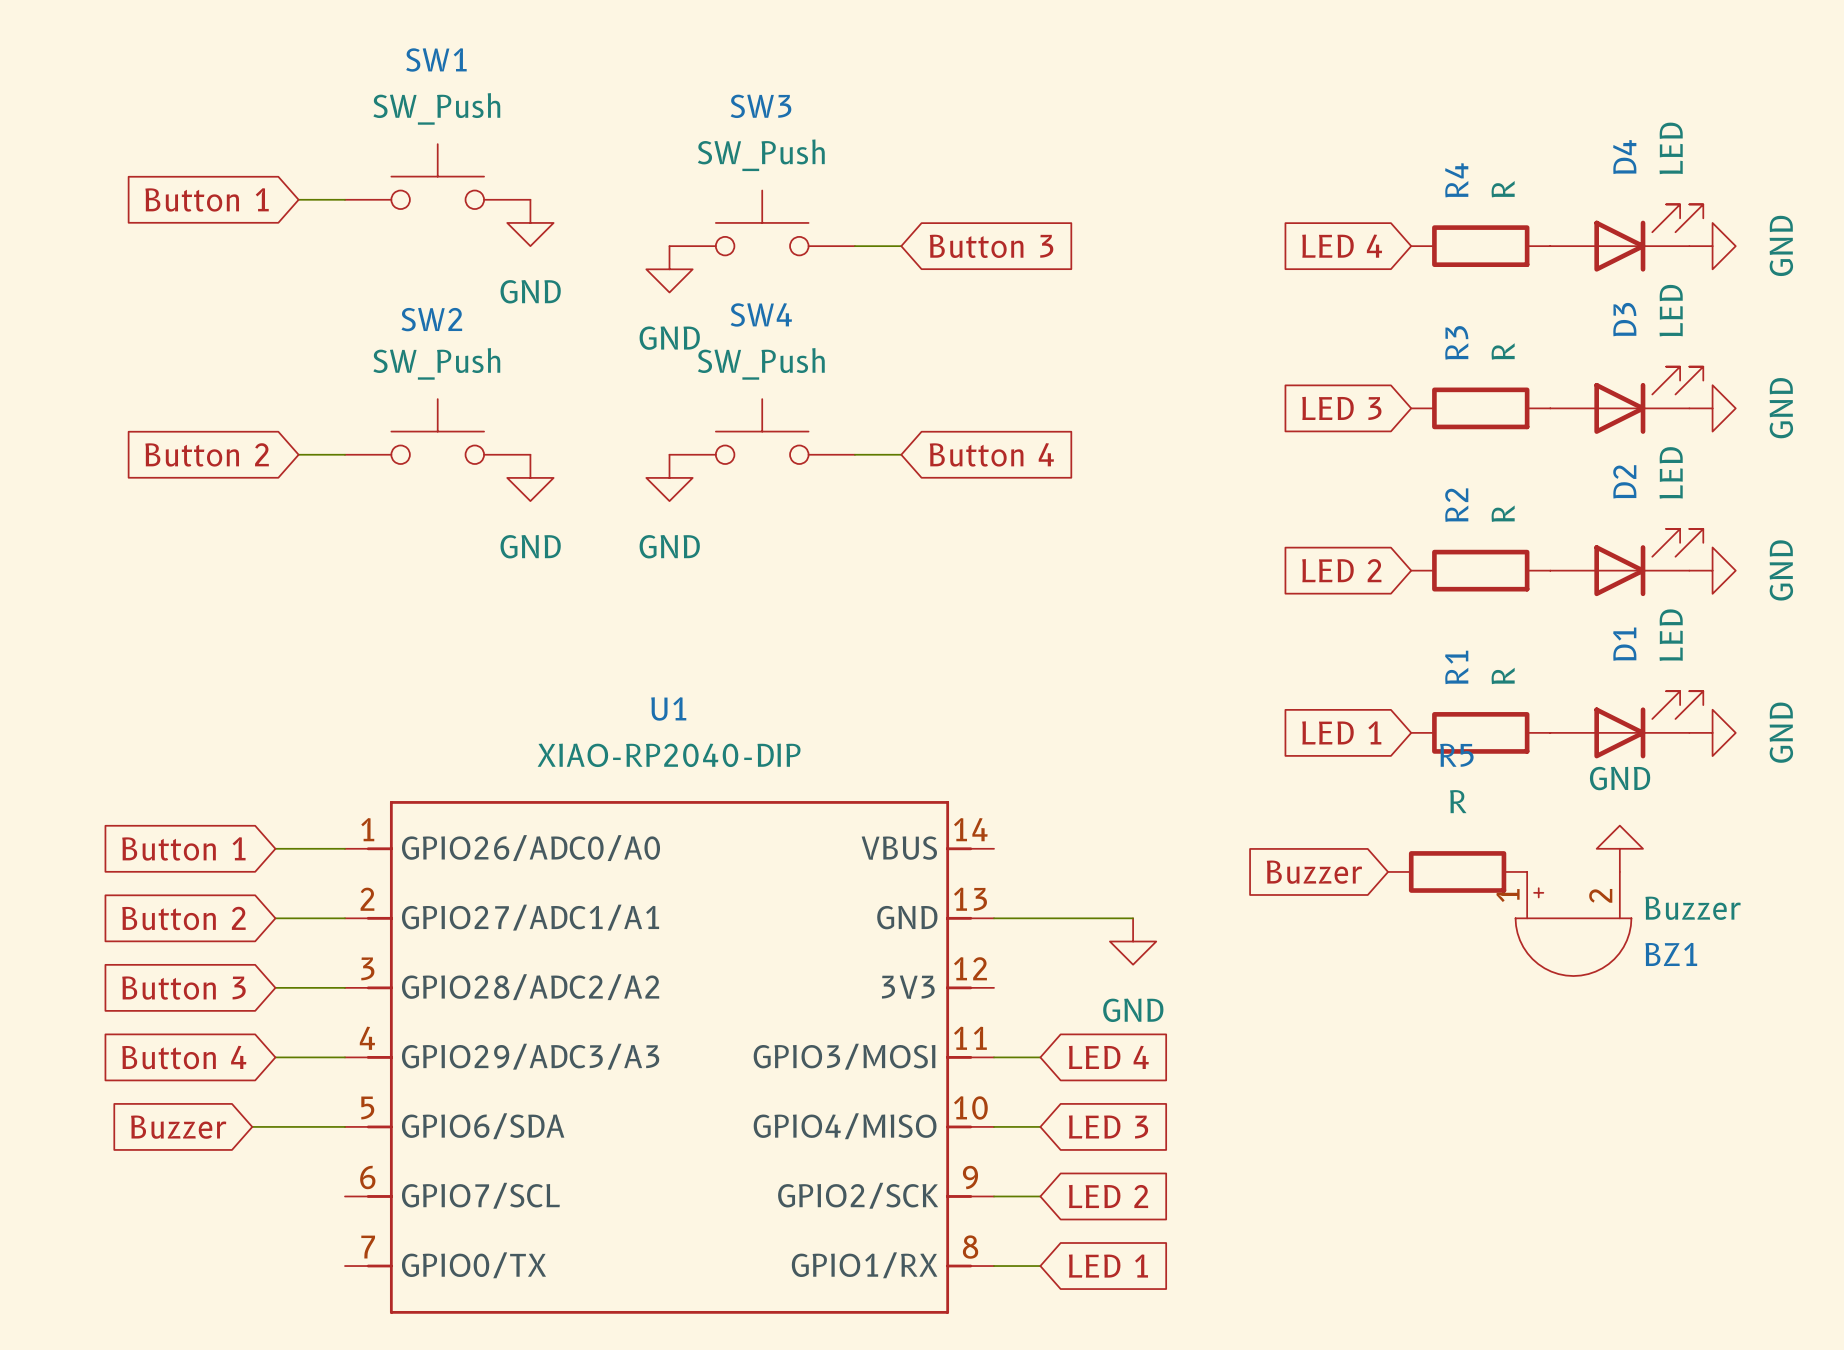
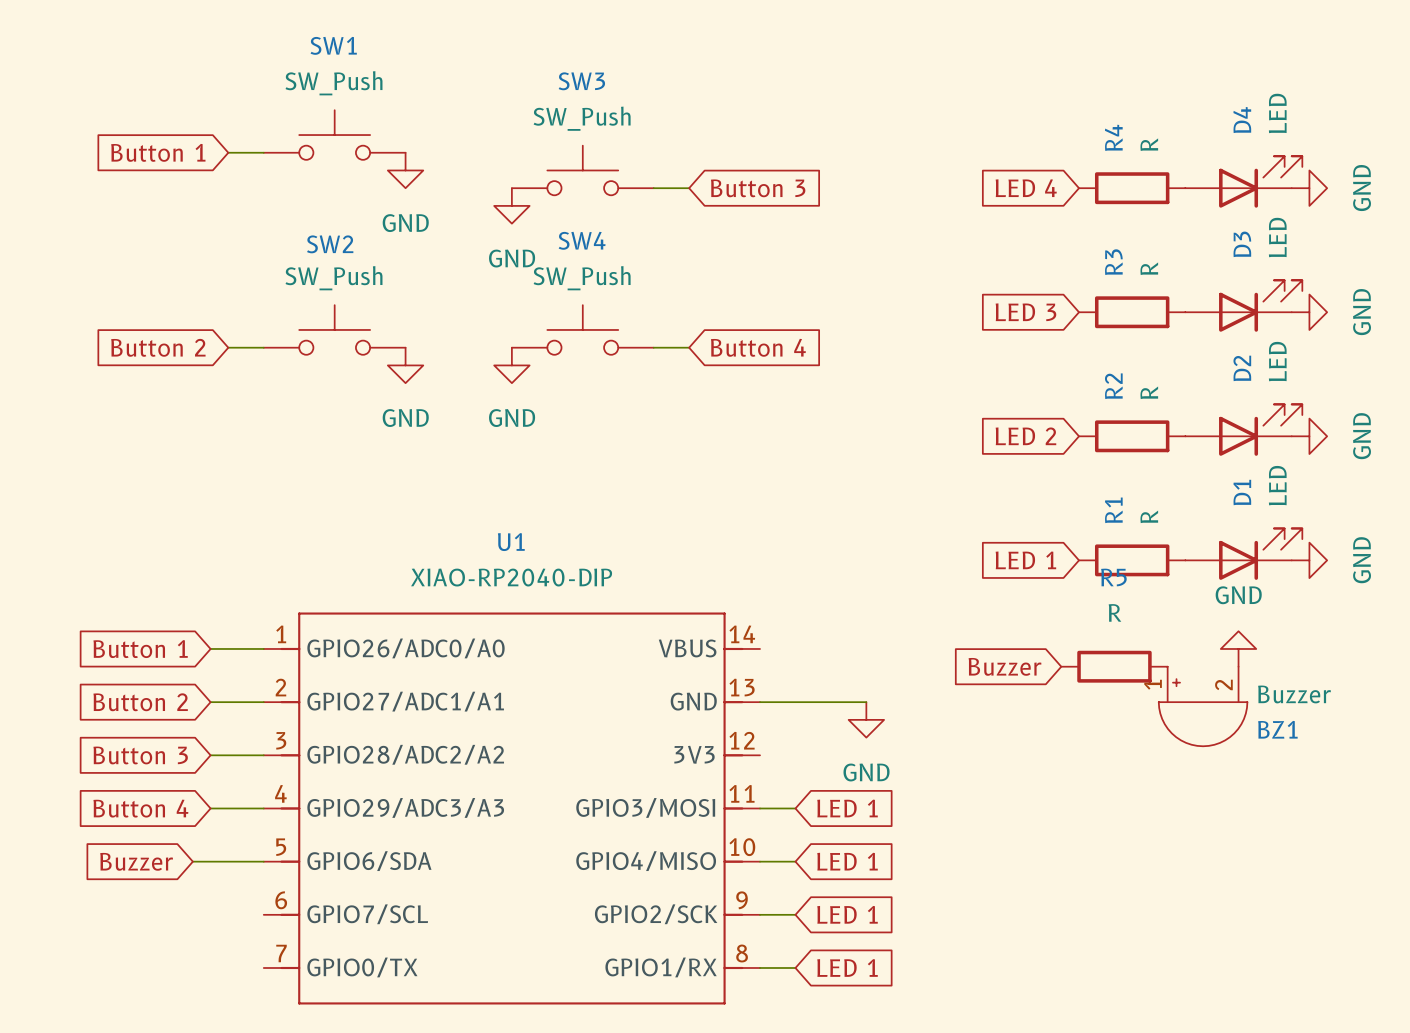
global label: LED 4 (1108, 1057) -> LED 1 (847, 808)
global label: LED 3 (1108, 1126) -> LED 1 (847, 861)
global label: LED 2 (1108, 1196) -> LED 1 (847, 914)

